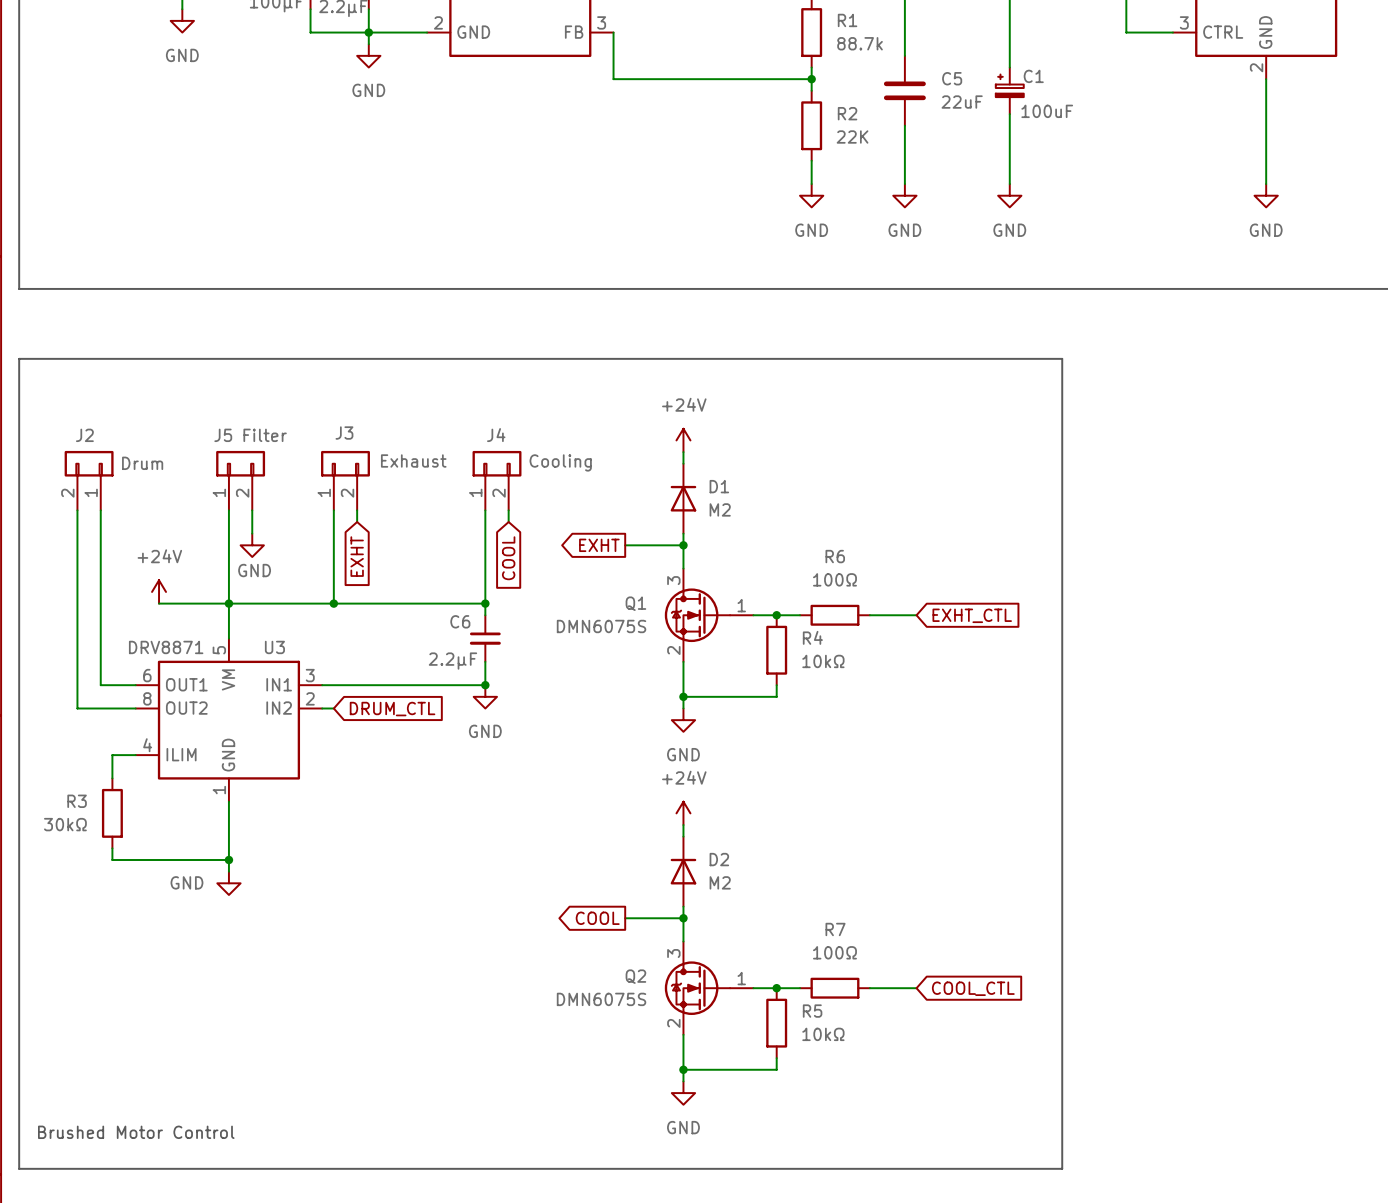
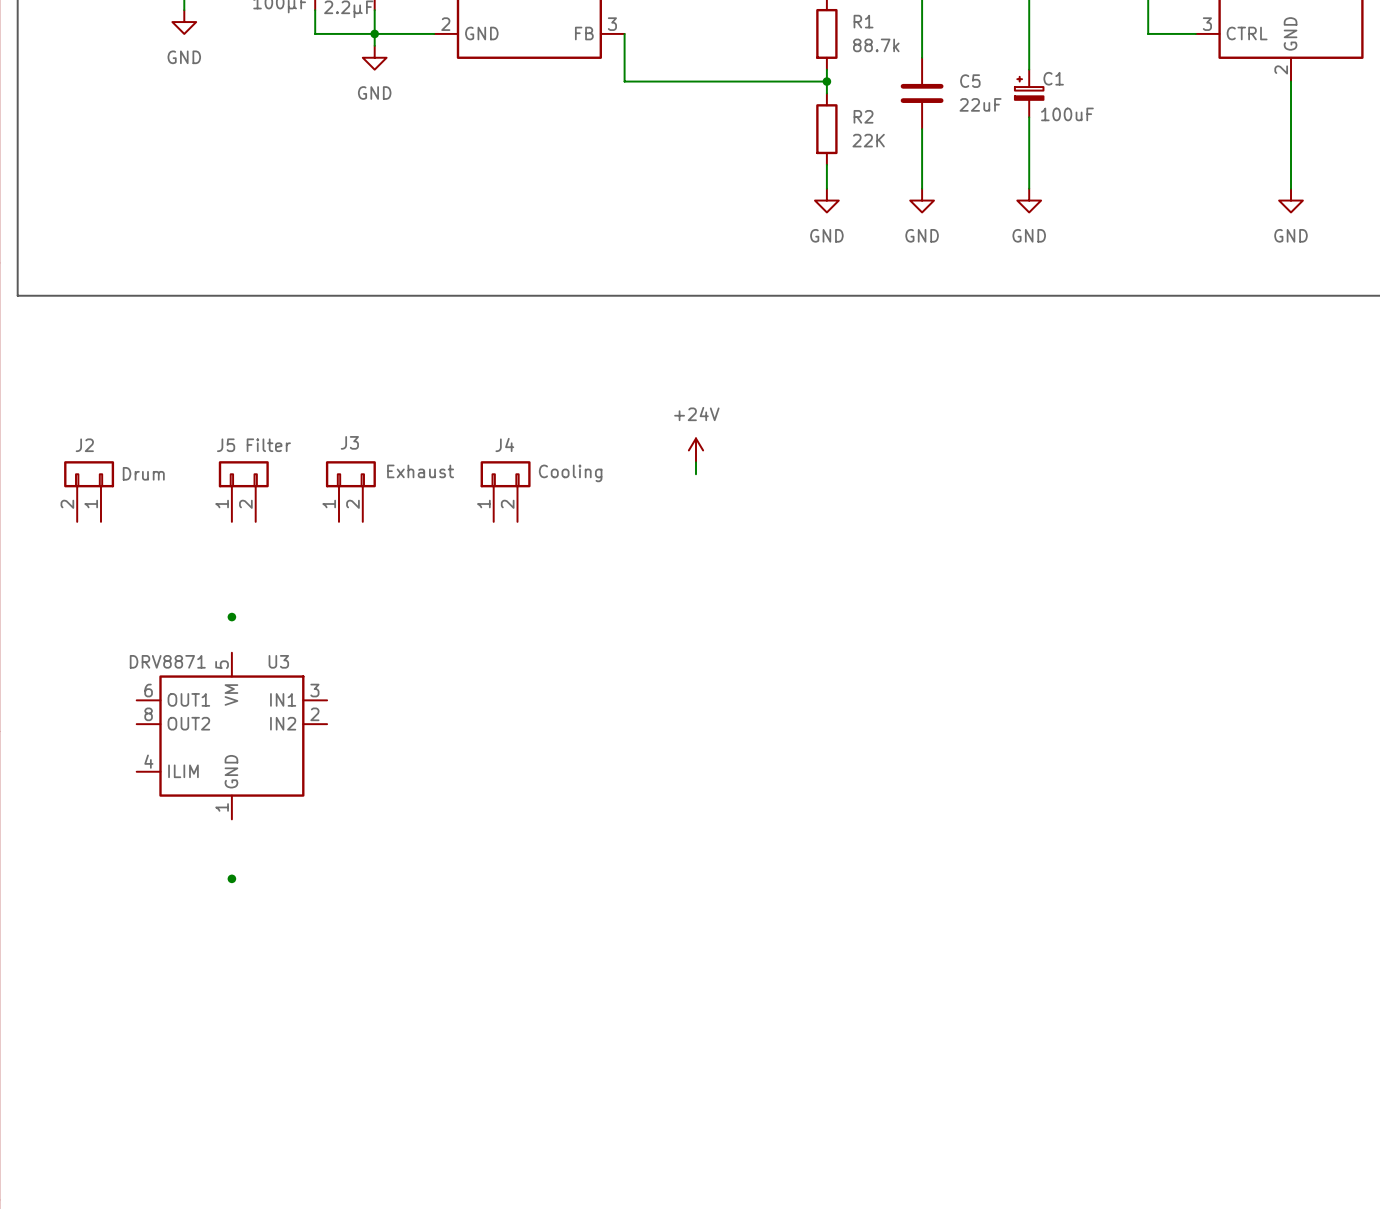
line: (19, 358) (1062, 358) (1062, 1168) (19, 1168) (19, 358) -> none
D1: M2 (683, 498) -> none
wire: (77, 510) (77, 708) (135, 708) -> none
wire: (100, 510) (100, 685) (135, 685) -> none
wire: (228, 510) (228, 638) -> none
wire: (252, 510) (252, 533) -> none
wire: (333, 510) (333, 603) -> none
wire: (357, 510) (357, 522) -> none
wire: (485, 510) (485, 615) -> none
wire: (508, 510) (508, 522) -> none
wire: (683, 533) (683, 568) -> none
power symbol: GND (252, 545) -> none
global label: EXHT (599, 545) -> none
wire: (625, 545) (683, 545) -> none
junction: (683, 545) -> none
global label: EXHT (357, 556) -> none
global label: COOL (508, 558) -> none
power symbol: +24V (159, 591) -> none
wire: (159, 603) (485, 603) -> none
junction: (333, 603) -> none
junction: (485, 603) -> none
Q1: DMN6075S (709, 615) -> none
wire: (753, 615) (800, 615) -> none
junction: (776, 615) -> none
R6: 100Ω (834, 615) -> none
wire: (869, 615) (916, 615) -> none
global label: EXHT_CTL (972, 615) -> none
C6: 2.2µF (485, 638) -> none
R4: 10kΩ (776, 650) -> none
wire: (485, 661) (485, 685) (322, 685) -> none
wire: (683, 661) (683, 708) -> none
junction: (485, 685) -> none
wire: (776, 685) (776, 696) (683, 696) -> none
power symbol: GND (485, 696) -> none
junction: (683, 696) -> none
wire: (322, 708) (333, 708) -> none
global label: DRUM_CTL (392, 709) -> none
power symbol: GND (683, 720) -> none
wire: (135, 755) (112, 755) (112, 778) -> none
wire: (228, 801) (228, 871) -> none
R3: 30kΩ (112, 813) -> none
power symbol: +24V (683, 813) -> none
wire: (683, 825) (683, 836) -> none
wire: (112, 848) (112, 860) (228, 860) -> none
D2: M2 (683, 871) -> none
power symbol: GND (228, 883) -> none
wire: (683, 906) (683, 941) -> none
global label: COOL (597, 918) -> none
wire: (625, 918) (683, 918) -> none
junction: (683, 918) -> none
Q2: DMN6075S (709, 988) -> none
wire: (753, 988) (800, 988) -> none
junction: (776, 988) -> none
R7: 100Ω (834, 988) -> none
wire: (869, 988) (916, 988) -> none
global label: COOL_CTL (973, 988) -> none
R5: 10kΩ (776, 1023) -> none
wire: (683, 1034) (683, 1081) -> none
wire: (776, 1058) (776, 1069) (683, 1069) -> none
junction: (683, 1069) -> none
power symbol: GND (683, 1093) -> none
text: Brushed Motor Control (136, 1132) -> none

